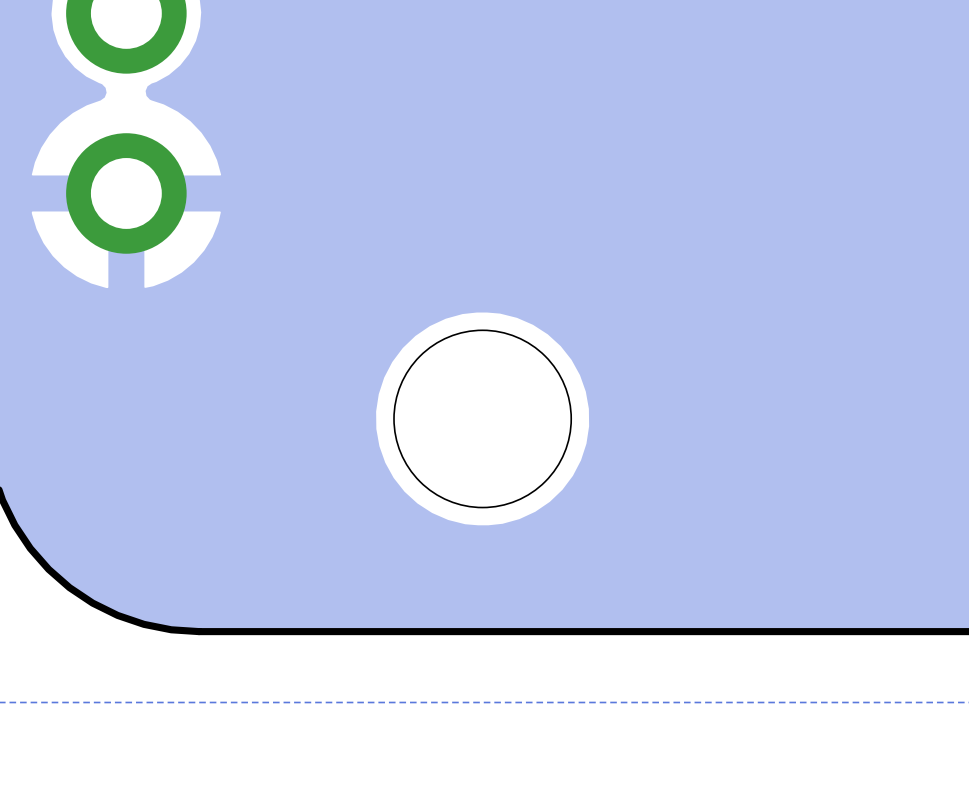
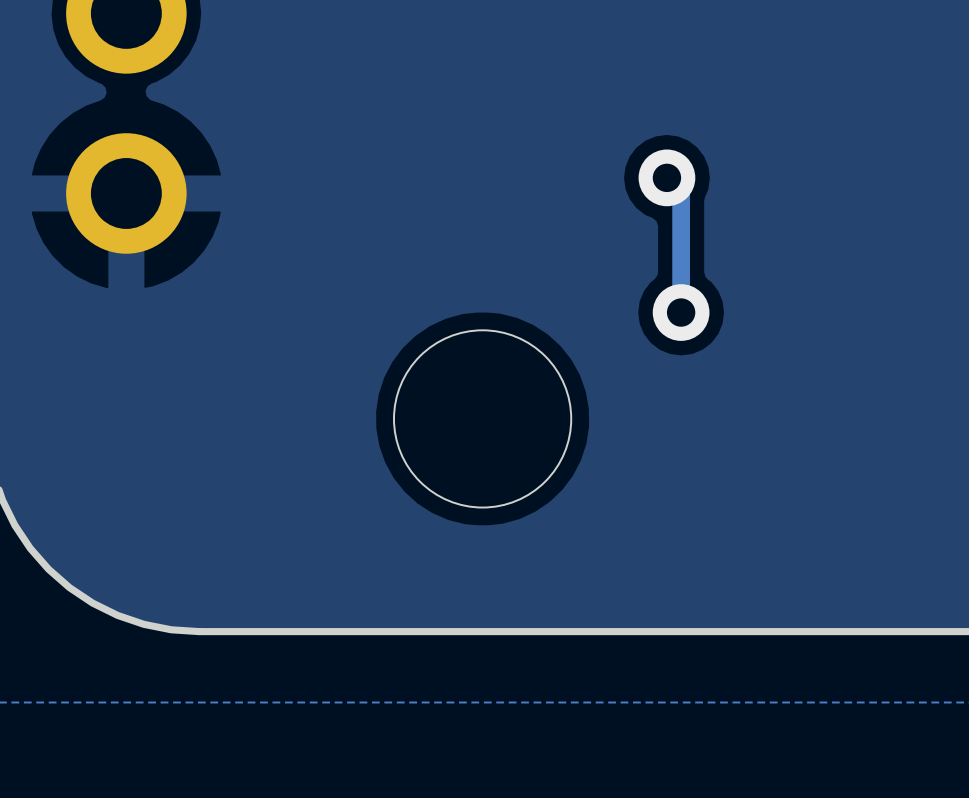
track: none -> (666, 177) (681, 192) (681, 312)
via: none -> (666, 177)
via: none -> (681, 312)

